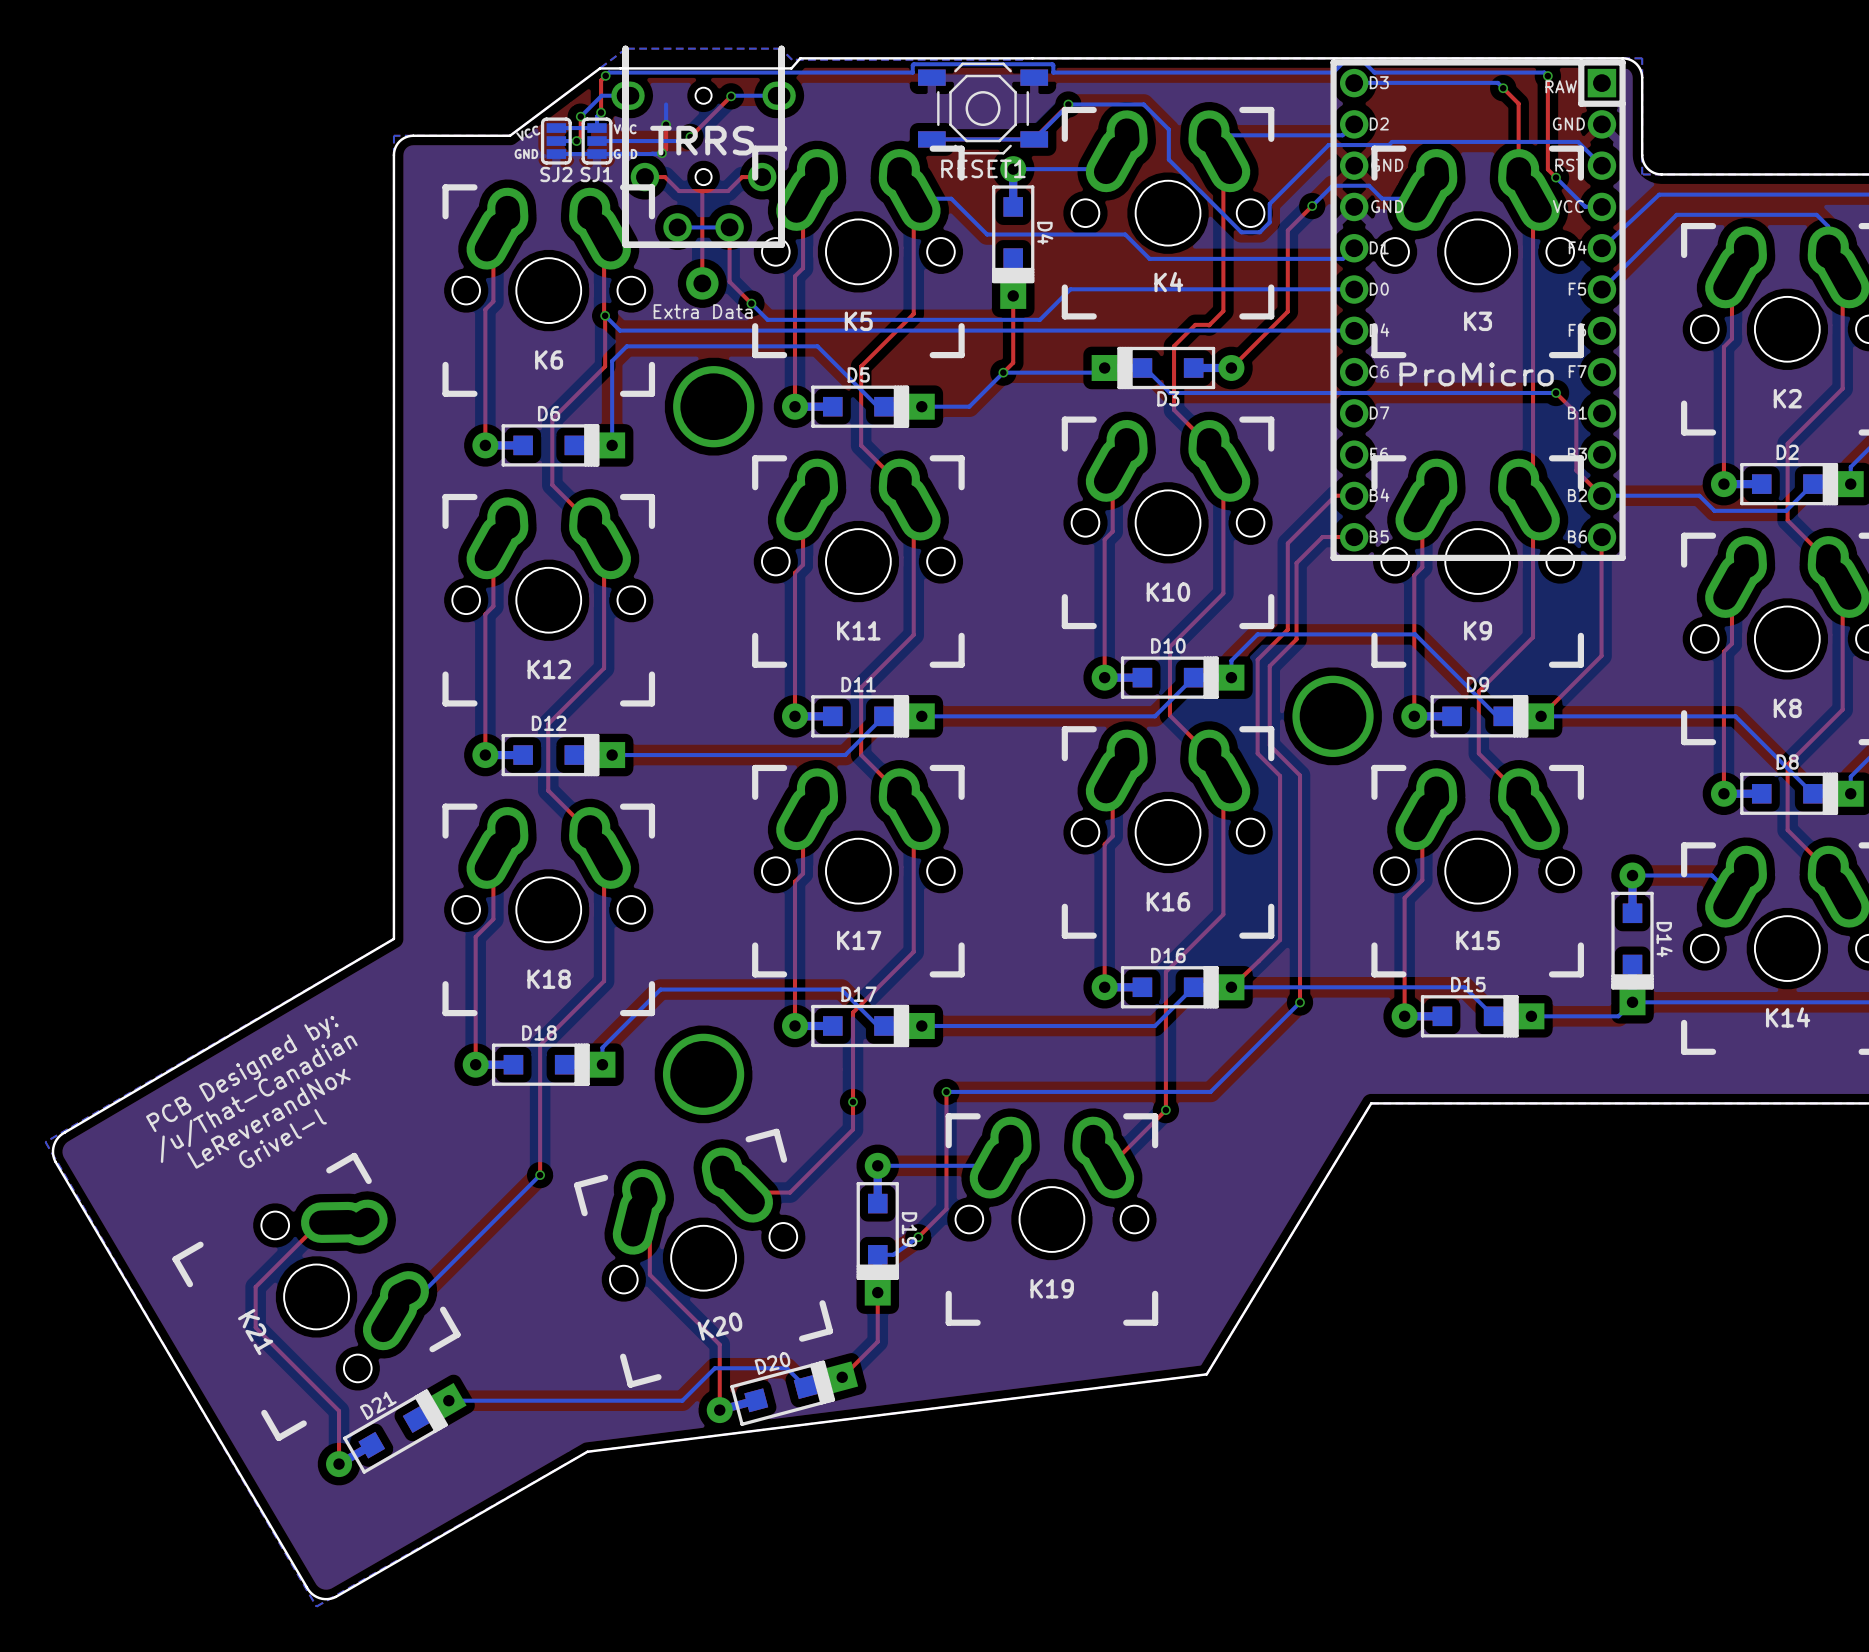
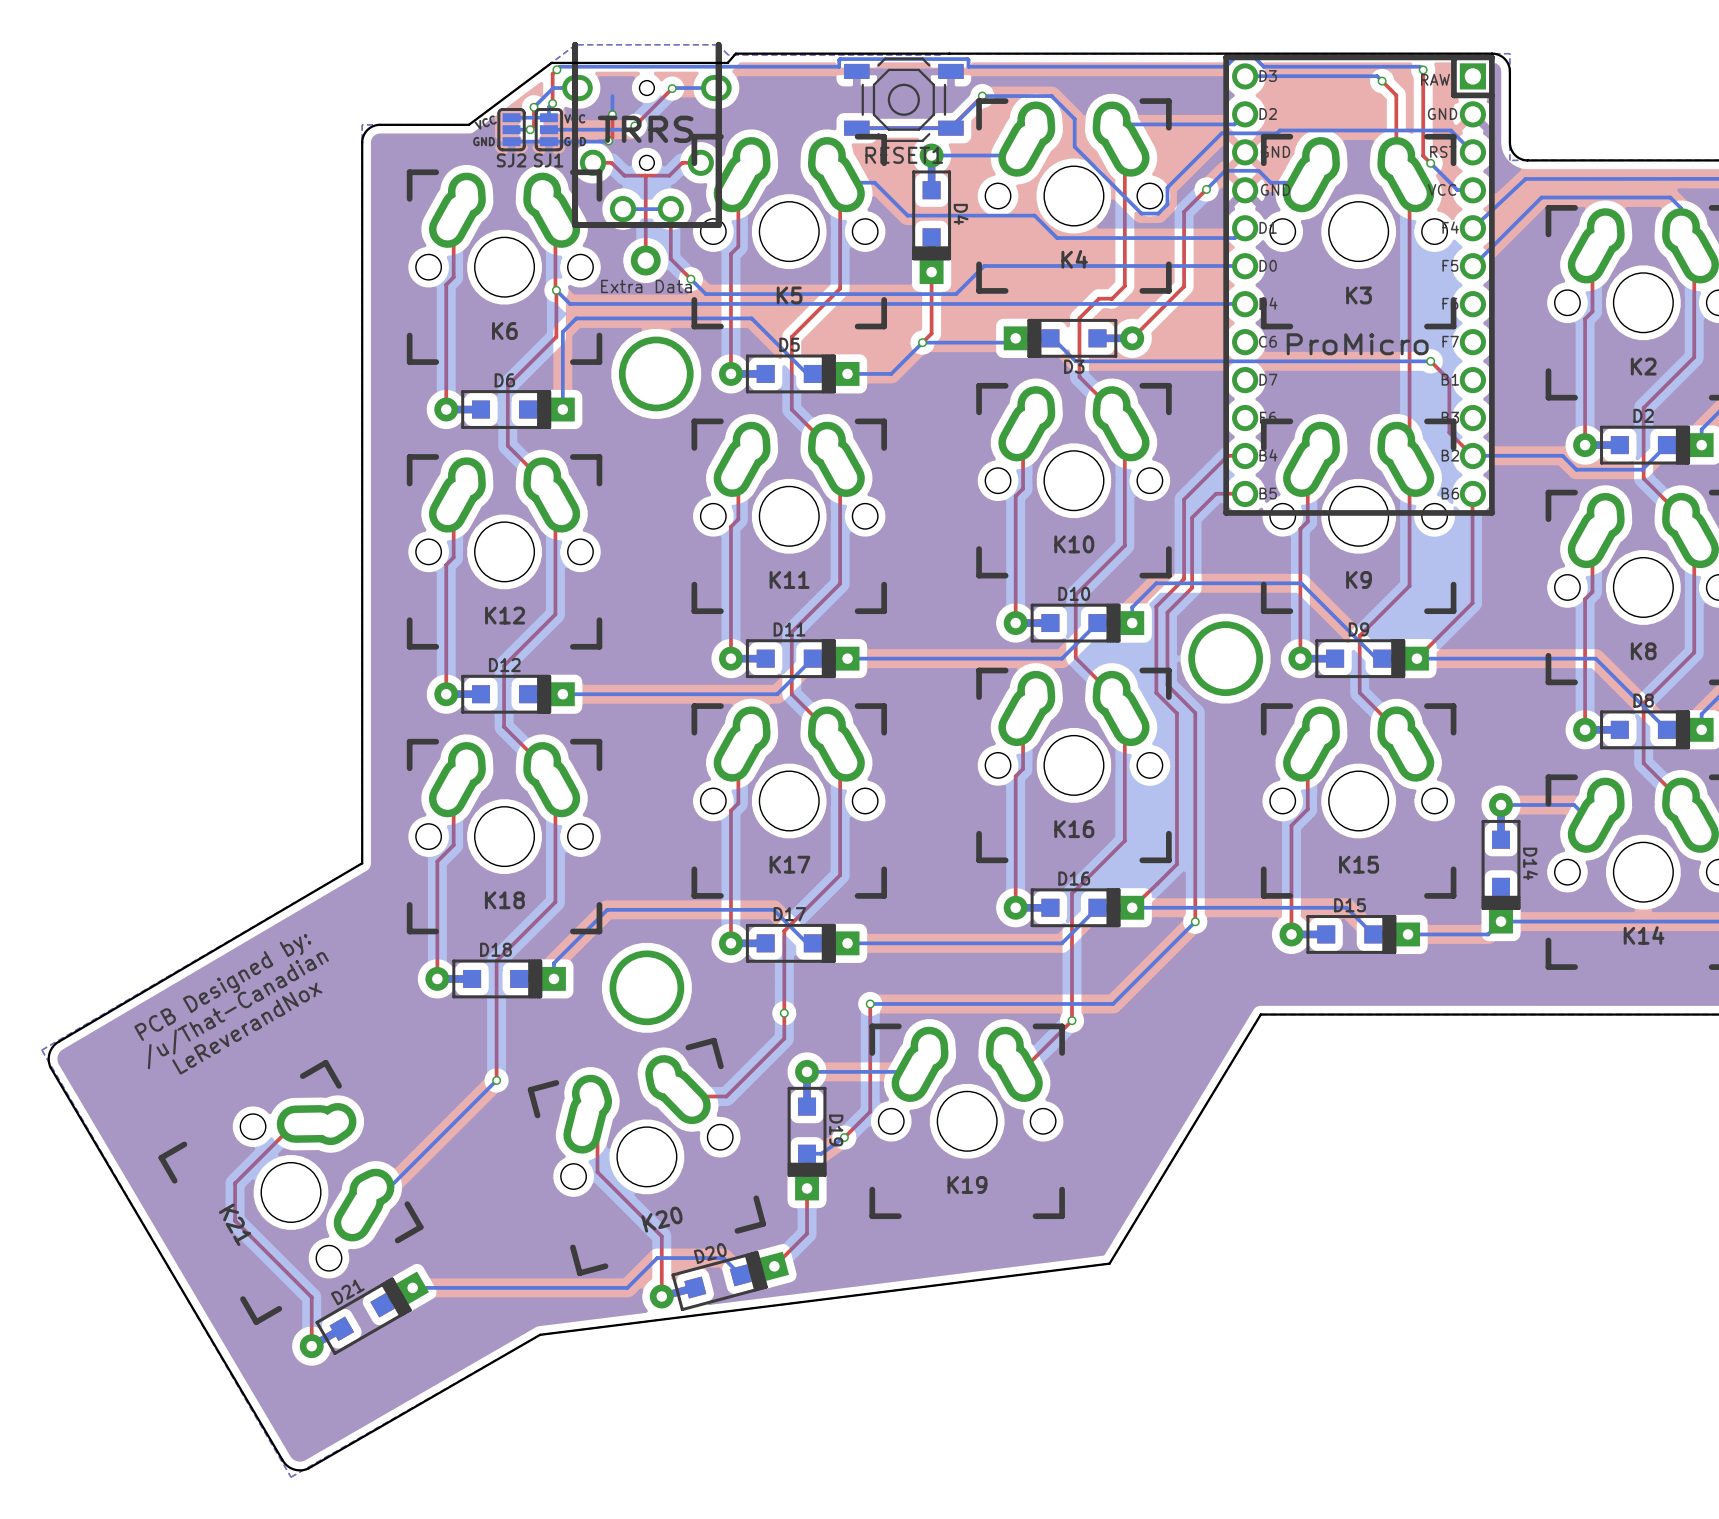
text: Grivel-l (282, 1138) -> none

